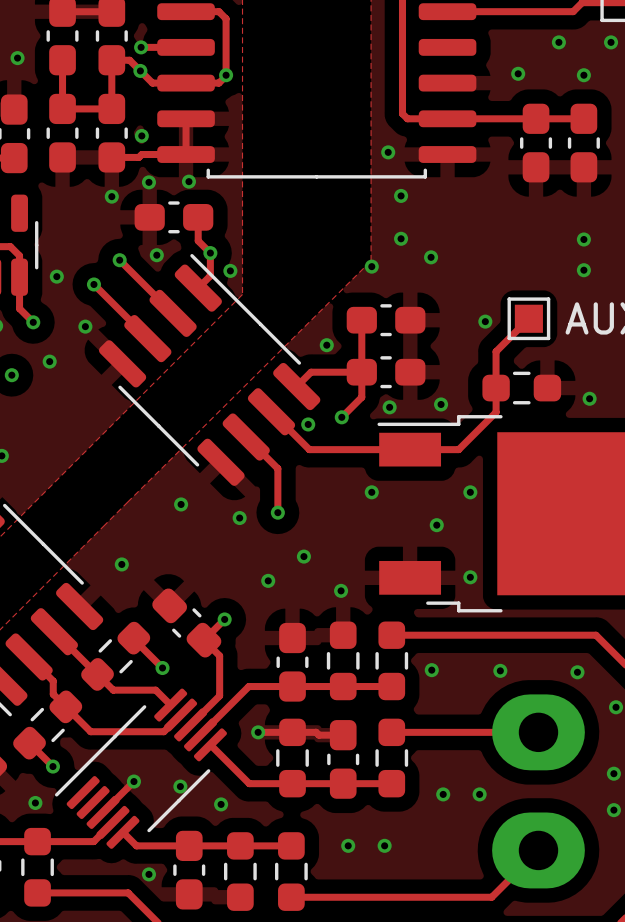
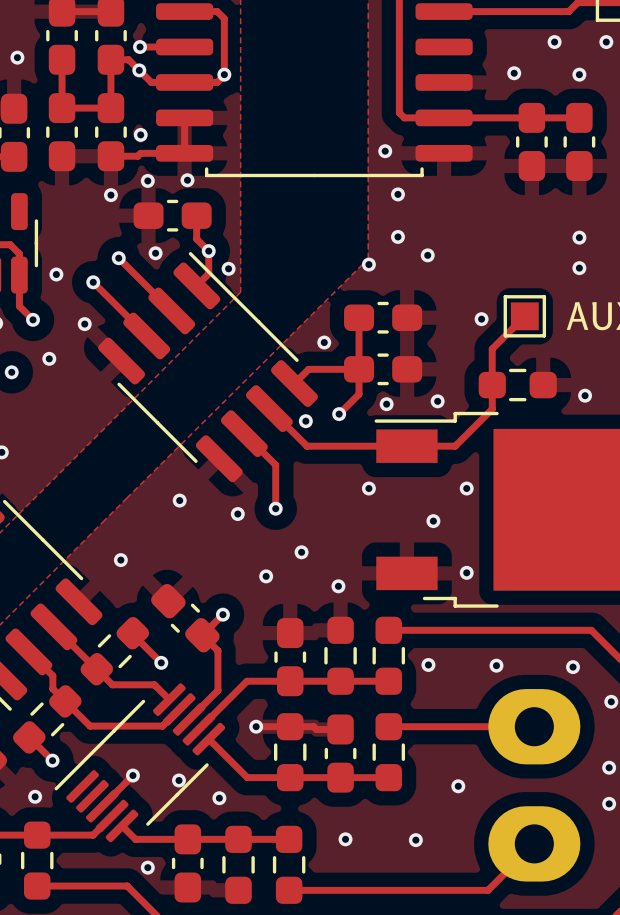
via: none -> (458, 786)
via: (443, 794) -> none
via: (479, 794) -> none
via: (384, 845) -> none
via: none -> (415, 840)

